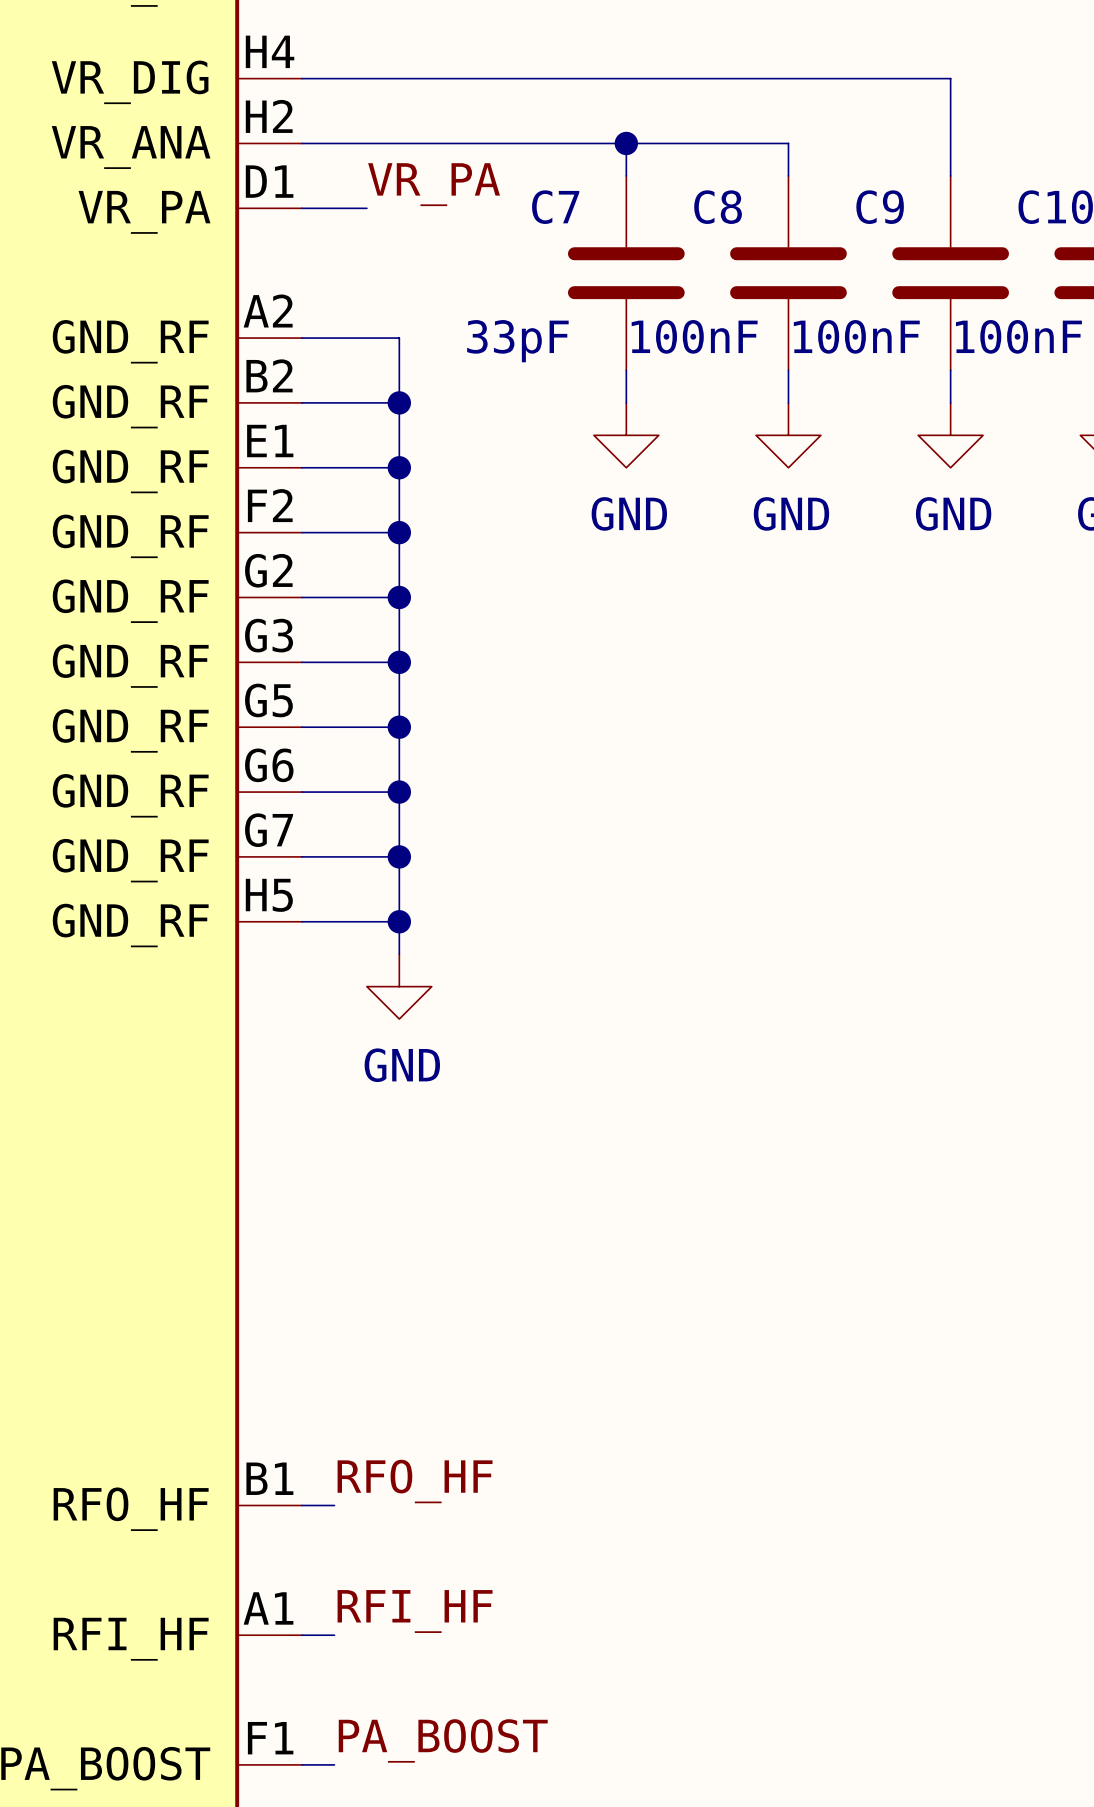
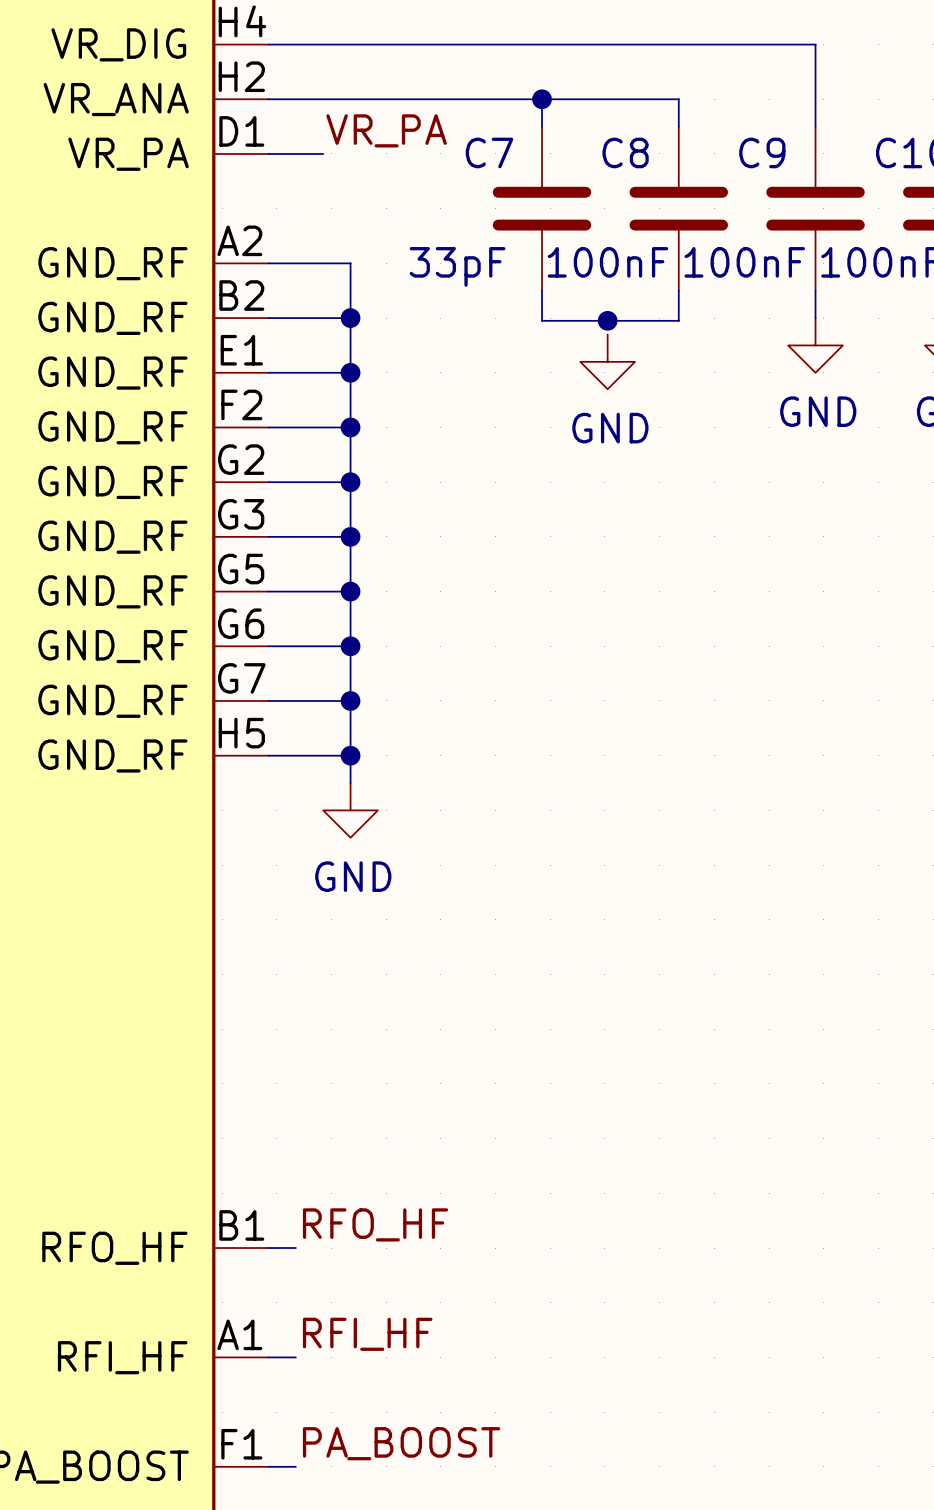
wire: none -> (542, 318) (542, 320) (678, 320) (678, 318)
junction: none -> (607, 320)
power symbol: GND (626, 435) -> none
power symbol: GND (788, 435) -> none
power symbol: none -> GND (607, 361)

